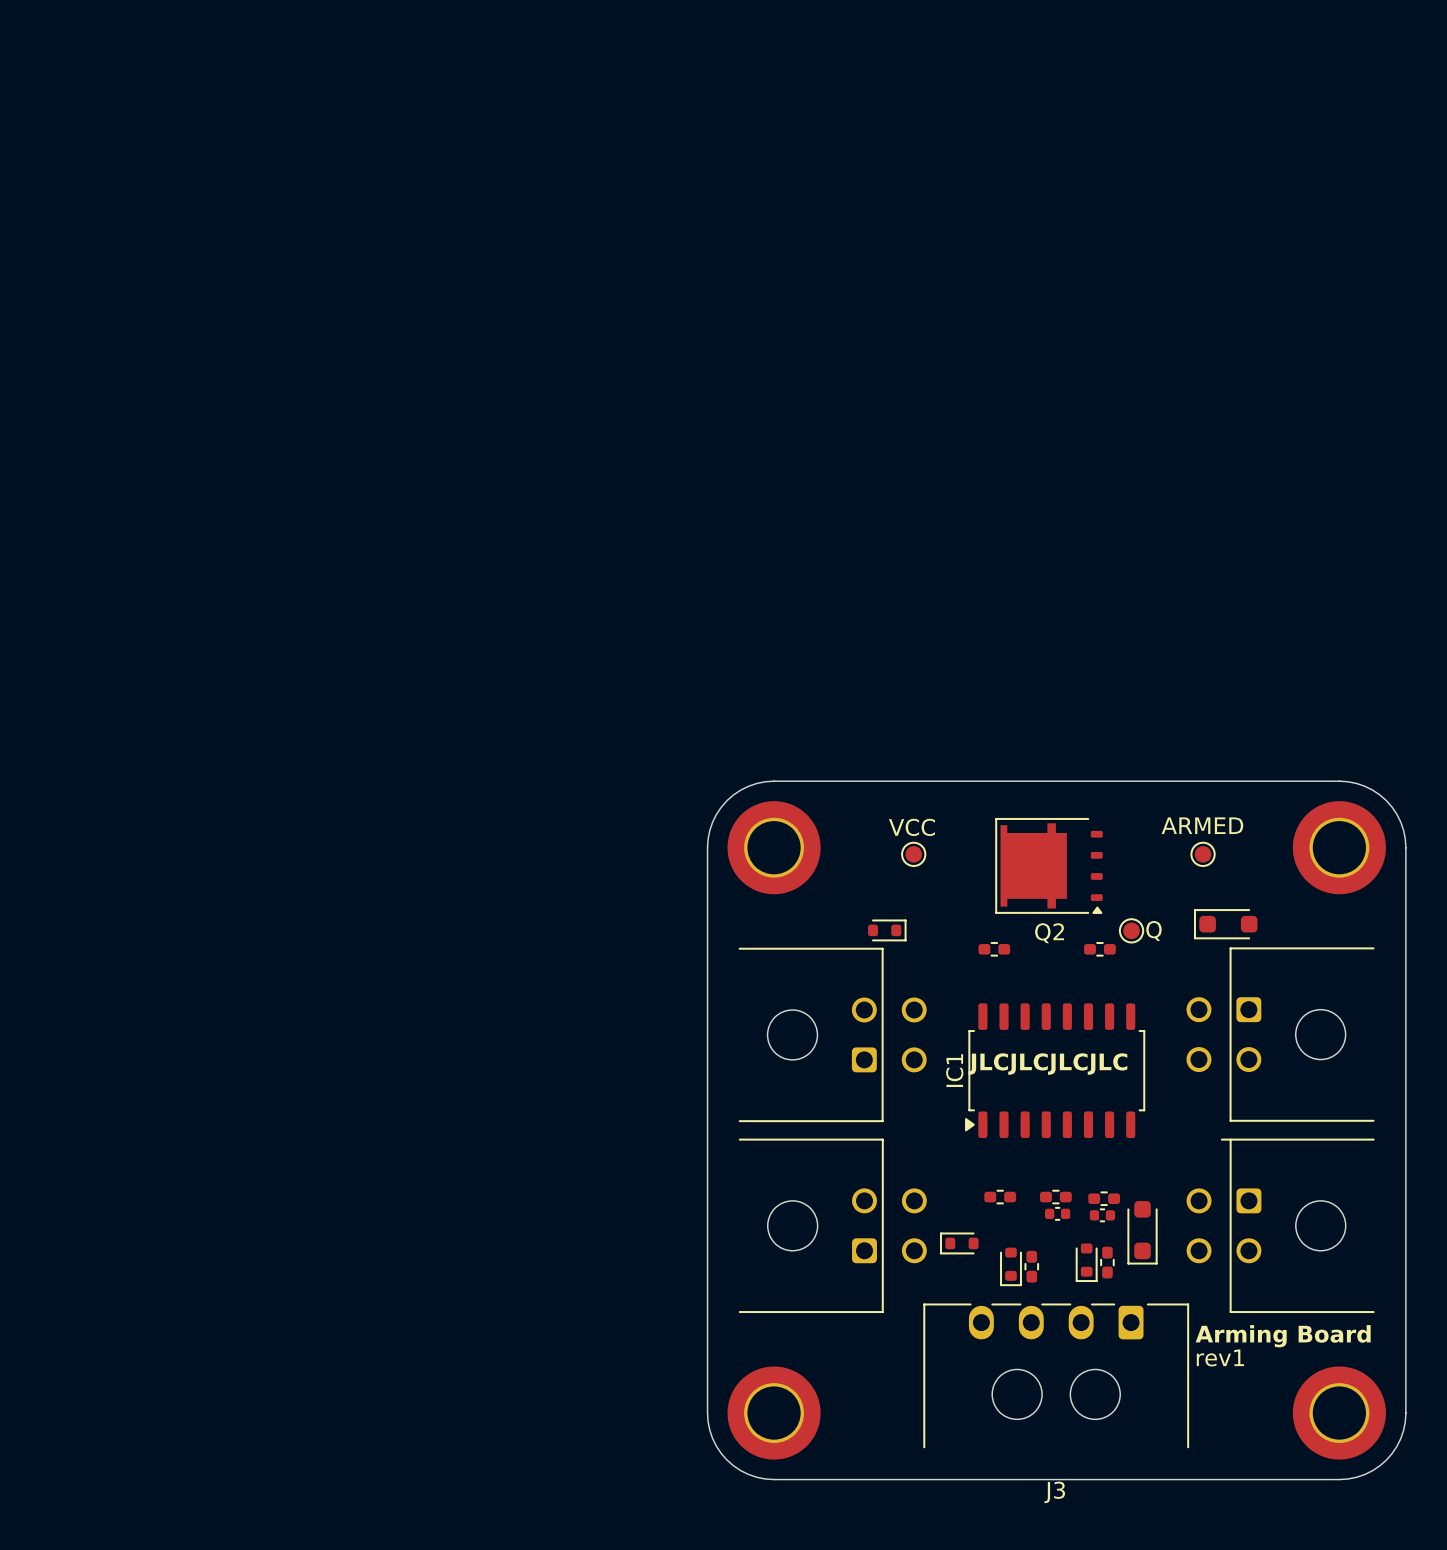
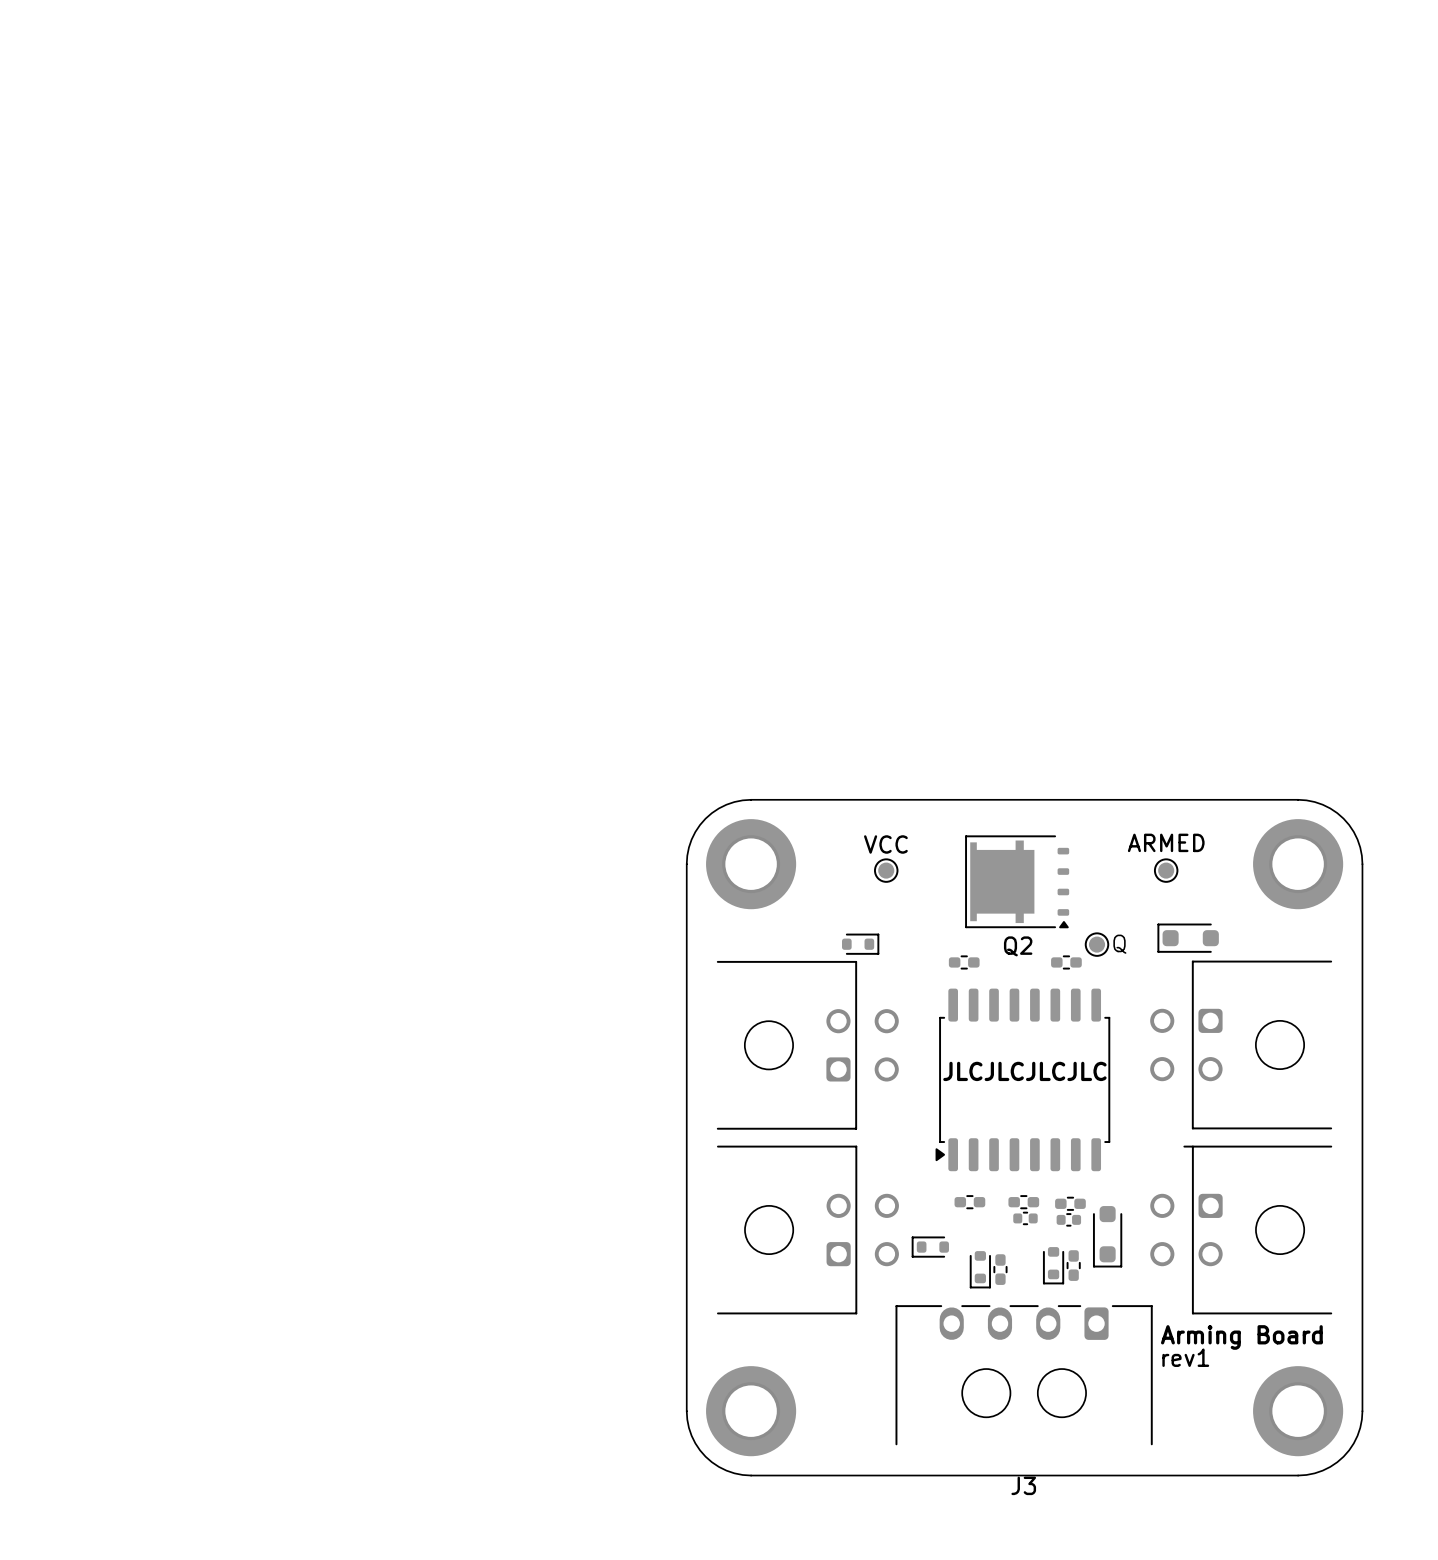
part: none -> (1022, 1079)
IC1: (1055, 1070) -> none

